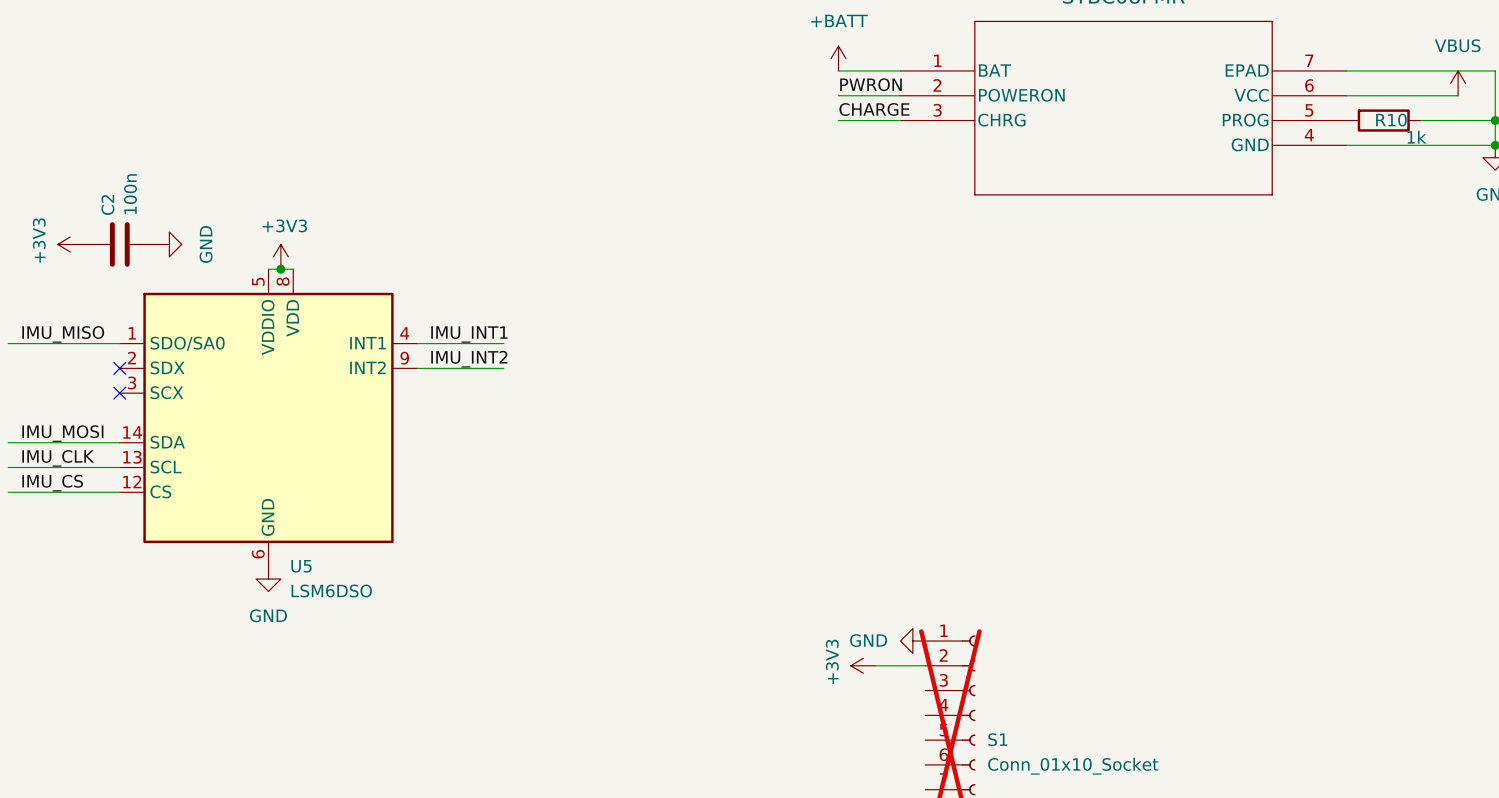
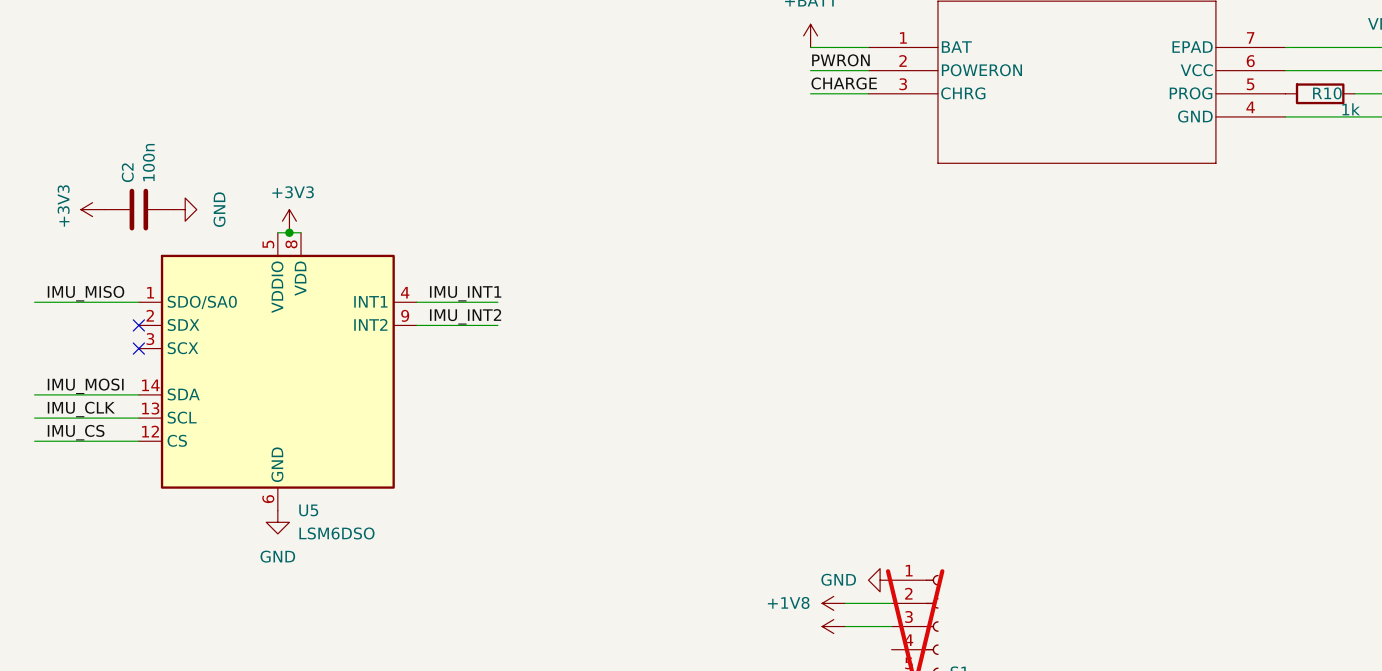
power symbol: +3V3 (863, 665) -> +1V8 (833, 603)
power symbol: none -> (833, 626)
wire: none -> (845, 626) (891, 626)

